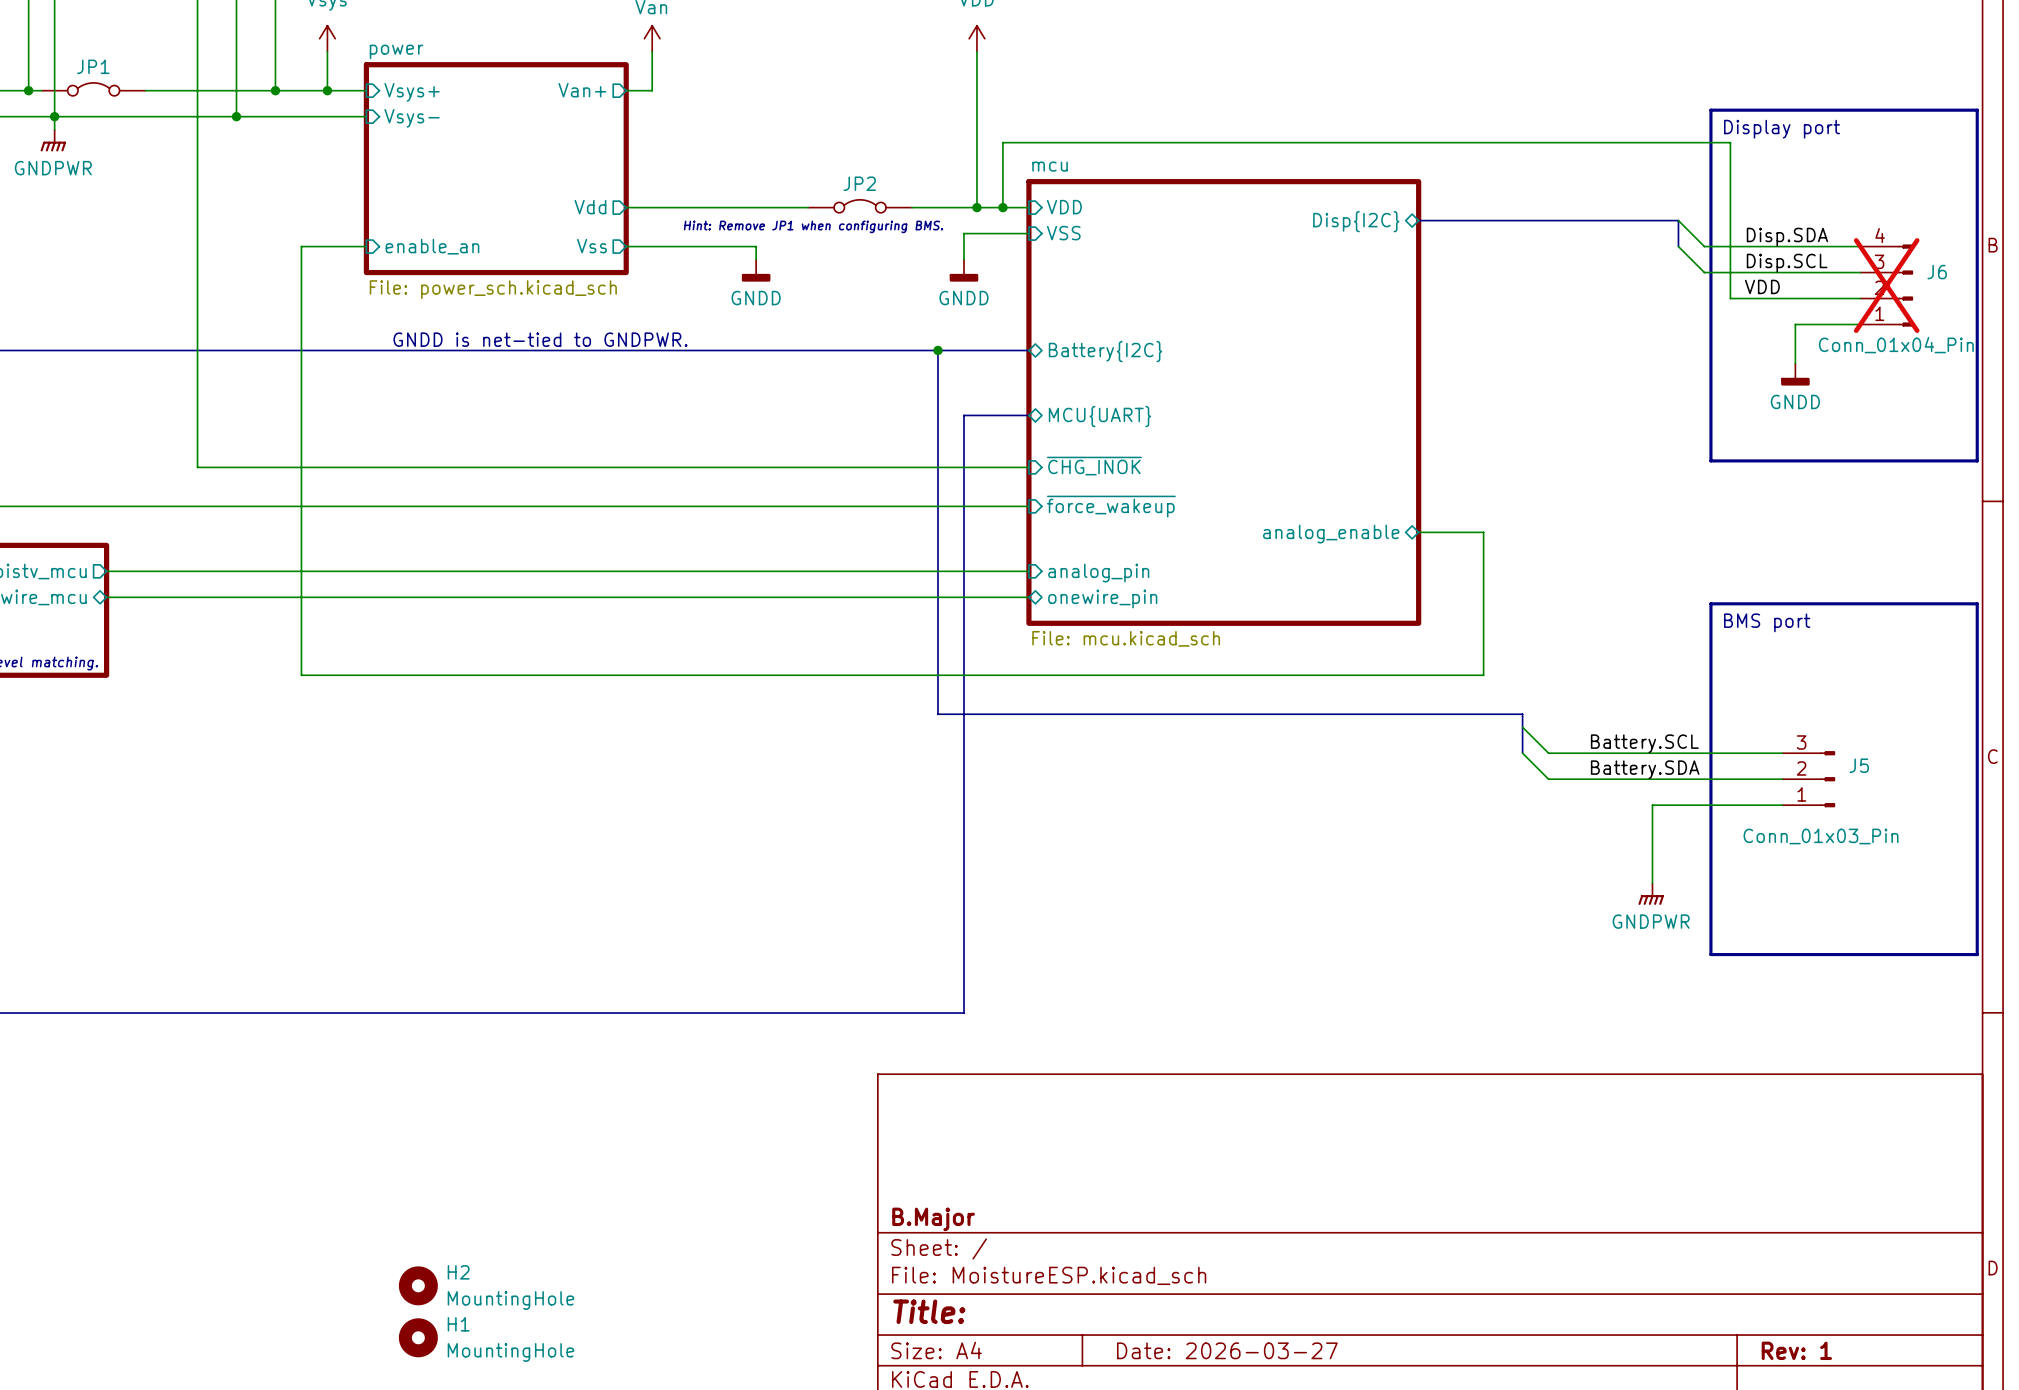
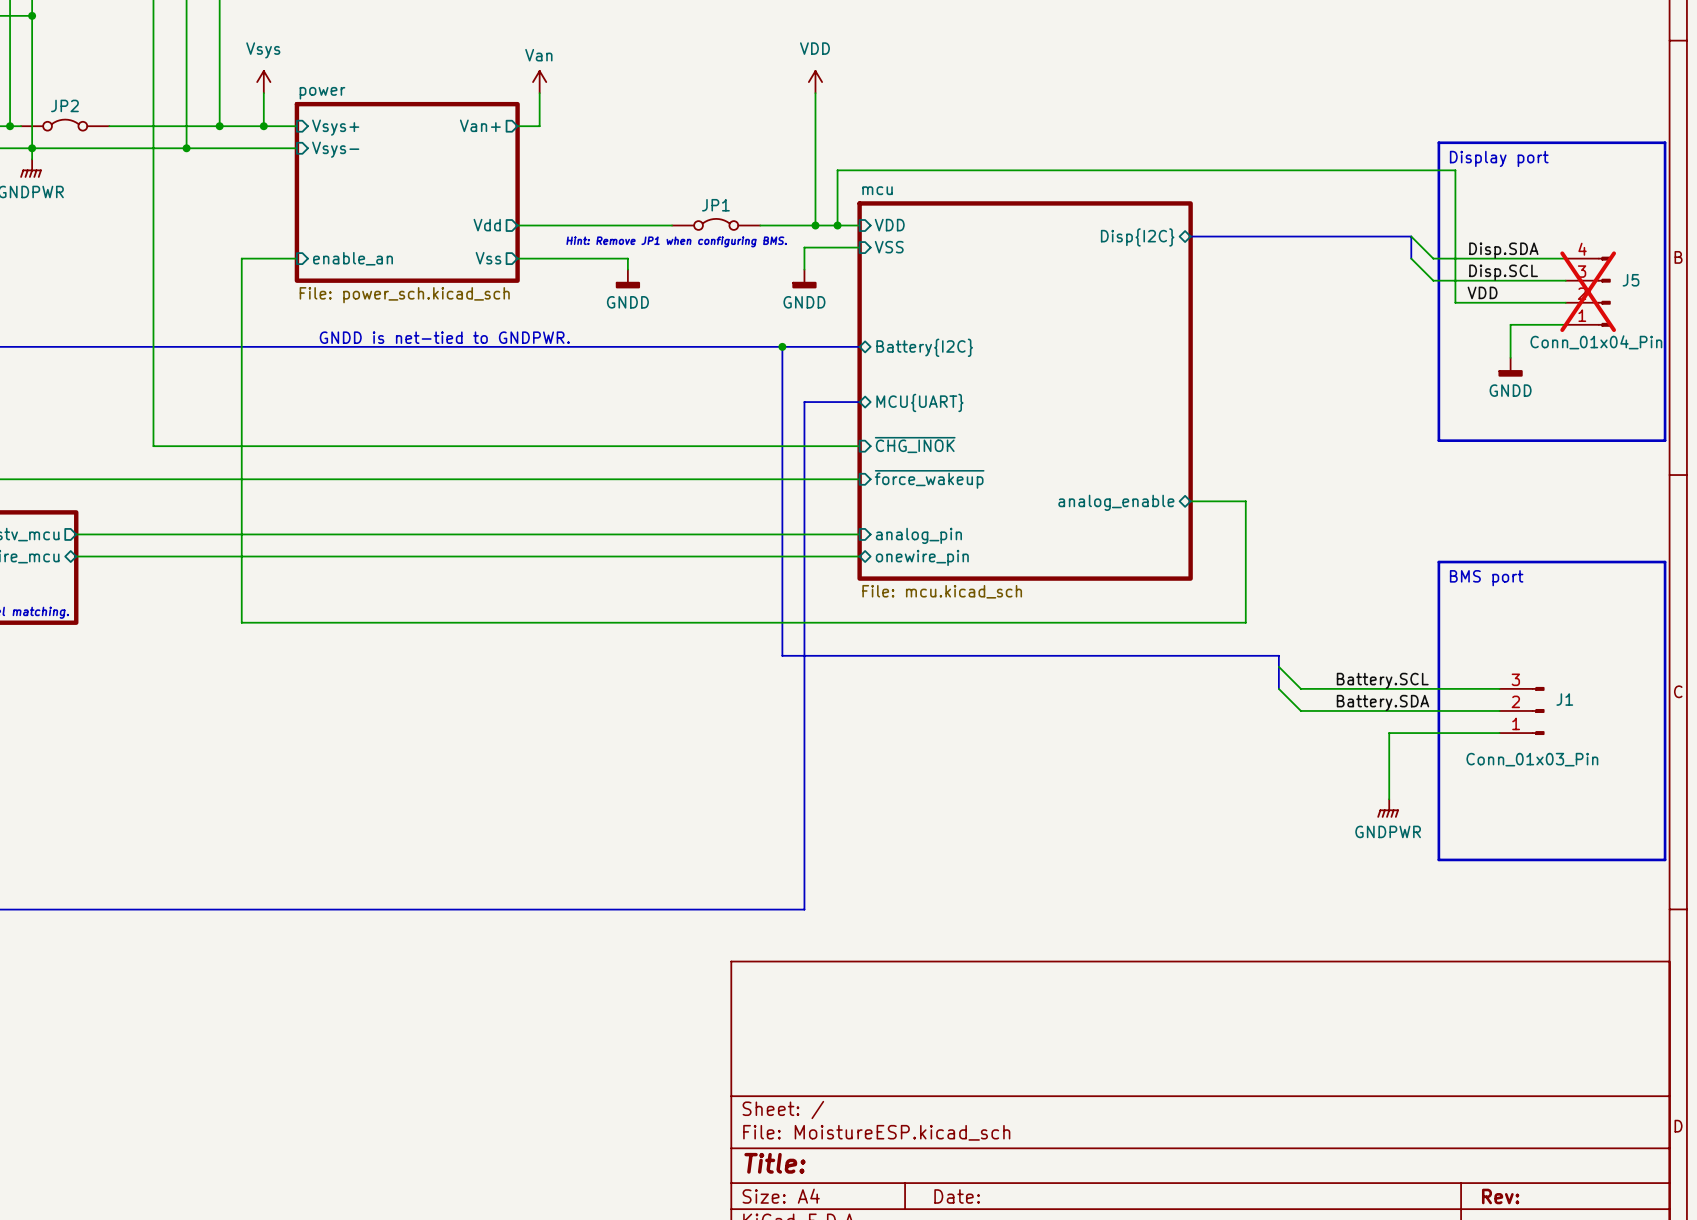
JP1 name: JP1 (93, 66) -> JP2 (64, 105)
JP2 name: JP2 (859, 183) -> JP1 (715, 205)
J6 name: J6 (1937, 272) -> J5 (1630, 280)
J5 name: J5 (1859, 765) -> J1 (1564, 699)
title block: B.Major (933, 1219) -> none
H2: MountingHole (418, 1285) -> none
H1: MountingHole (418, 1337) -> none
title block: Date: 2026-03-27 (1227, 1350) -> Date: (957, 1196)
title block: Rev: 1 (1796, 1350) -> Rev: (1500, 1196)

